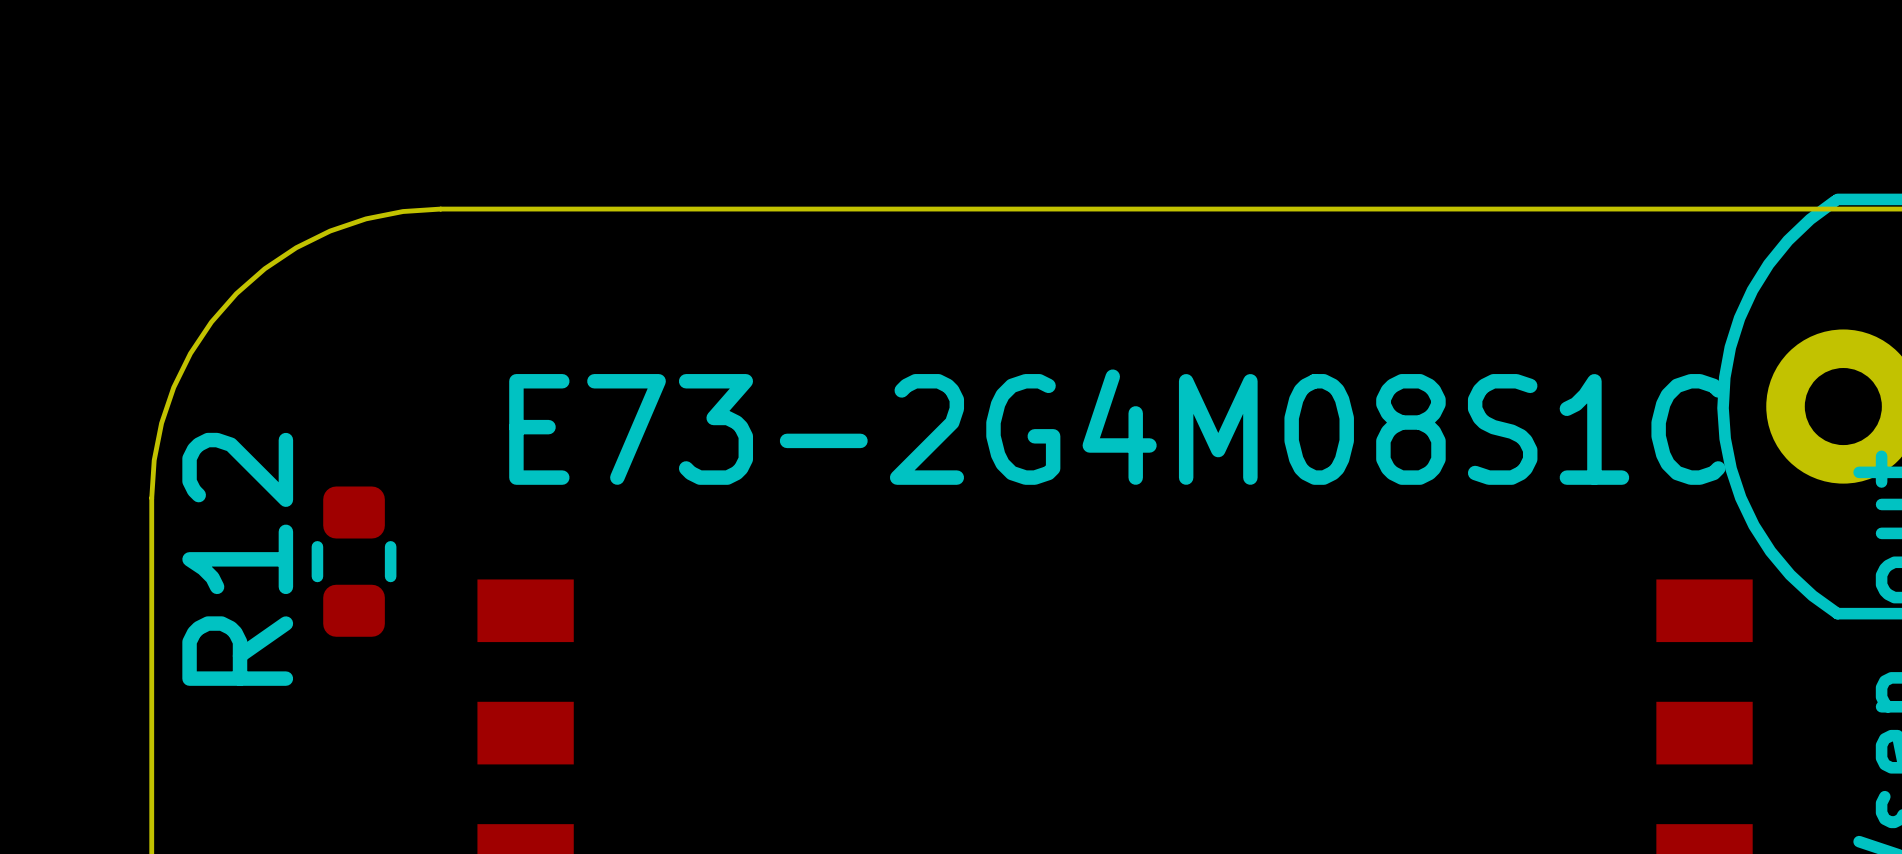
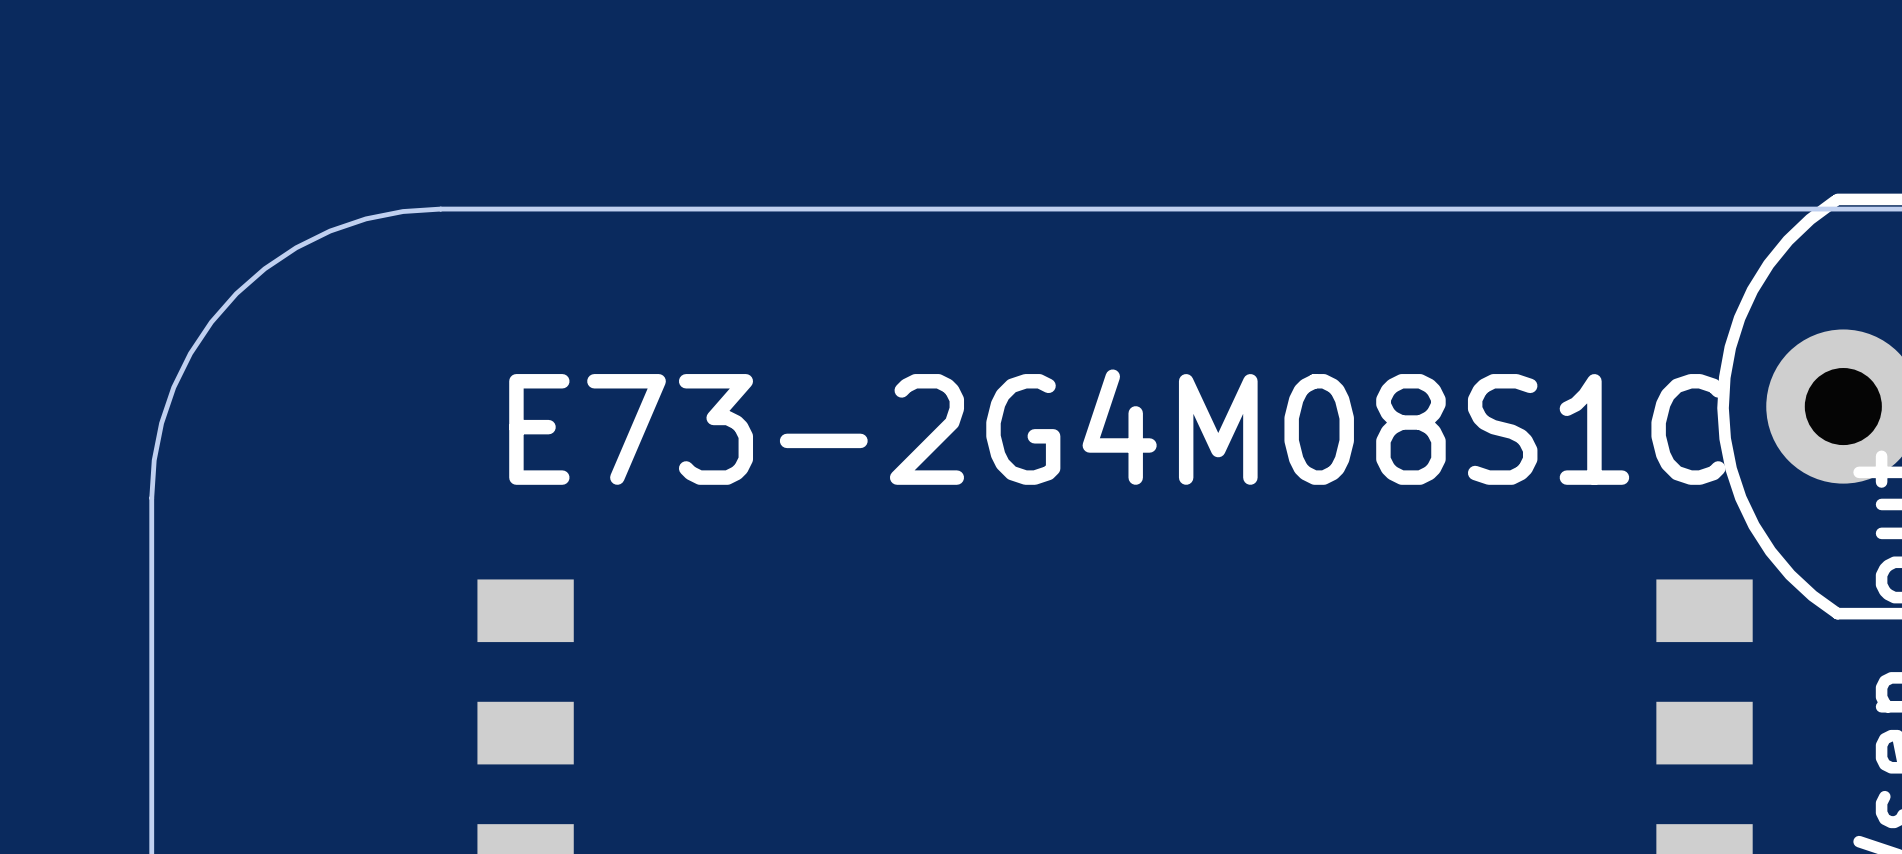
R12: (354, 561) -> none

